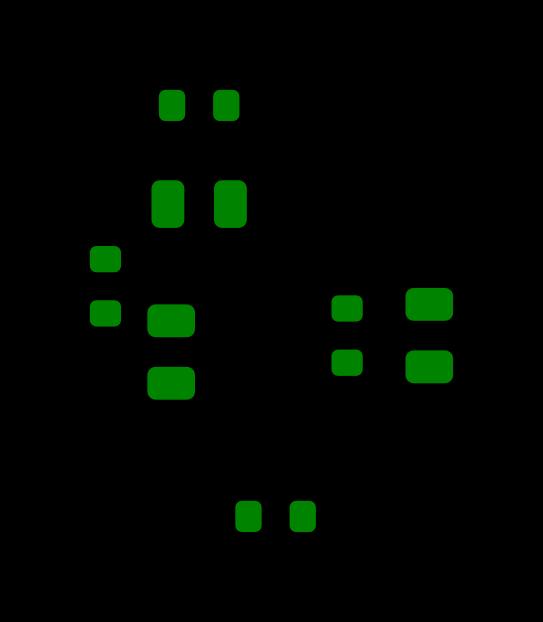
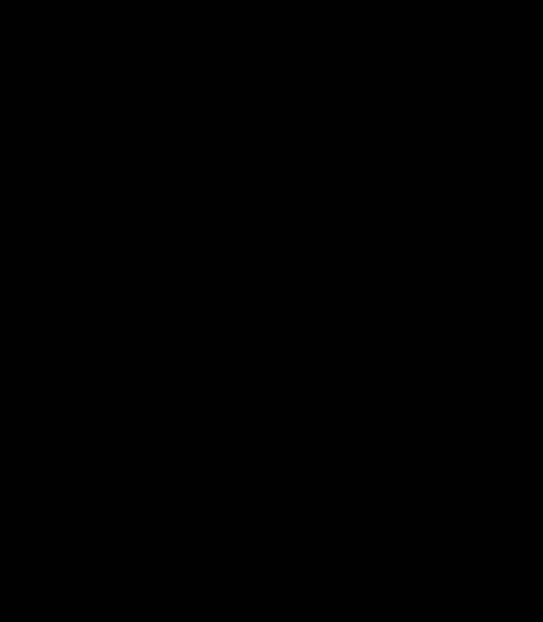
part: (199, 105) -> none
part: (199, 204) -> none
part: (105, 286) -> none
part: (347, 335) -> none
part: (429, 335) -> none
part: (171, 352) -> none
part: (275, 516) -> none

